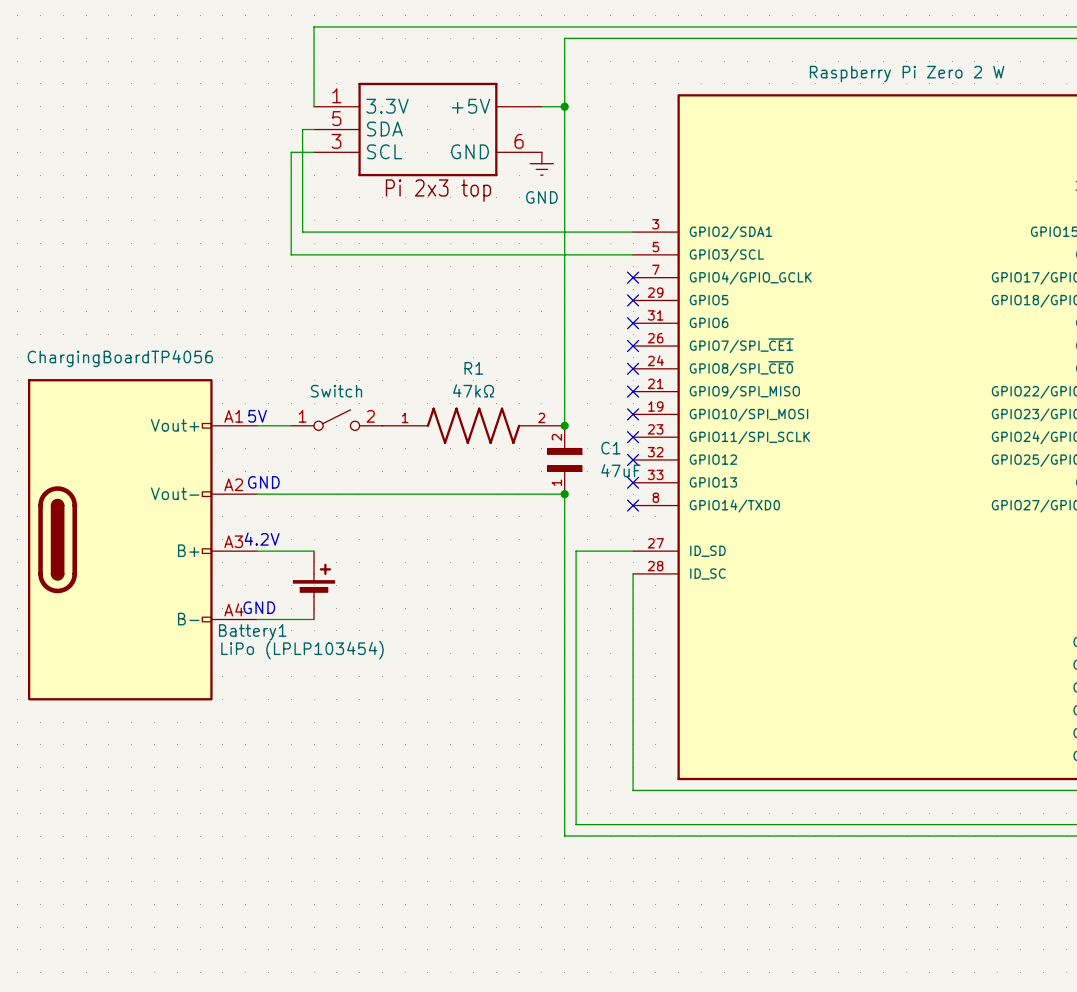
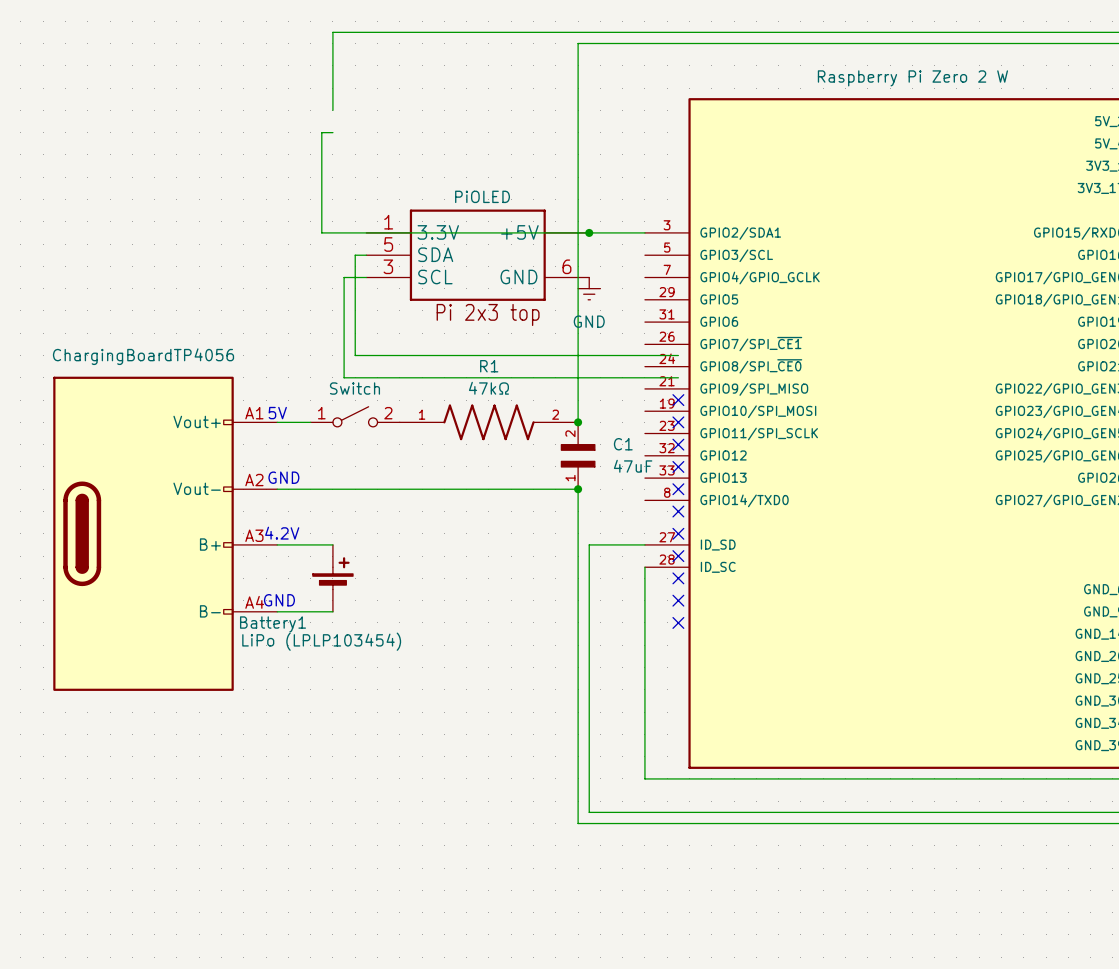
wire: (541, 106) (564, 106) -> none
junction: (564, 106) -> none
part: (427, 129) -> none
wire: (314, 152) (291, 152) (291, 254) (336, 254) -> (678, 355) (355, 355) (355, 255)
power symbol position: GND (541, 163) -> GND (589, 288)
junction: none -> (589, 232)
wire: (348, 254) (633, 254) -> none
PiOLED: none -> (477, 255)
wire: none -> (366, 277) (344, 277) (344, 377) (678, 377)
no-connect mark: (633, 277) -> none
no-connect mark: (633, 300) -> none
no-connect mark: (633, 323) -> none
no-connect mark: (633, 346) -> none
no-connect mark: (633, 368) -> none
no-connect mark: (633, 391) -> none
no-connect mark: none -> (678, 400)
no-connect mark: (633, 414) -> none
no-connect mark: none -> (678, 422)
no-connect mark: (633, 437) -> none
no-connect mark: none -> (678, 444)
no-connect mark: (633, 459) -> none
no-connect mark: none -> (678, 466)
no-connect mark: (633, 482) -> none
no-connect mark: none -> (678, 489)
no-connect mark: (633, 505) -> none
no-connect mark: none -> (678, 511)
no-connect mark: none -> (678, 533)
no-connect mark: none -> (678, 556)
no-connect mark: none -> (678, 578)
no-connect mark: none -> (678, 600)
no-connect mark: none -> (678, 622)

